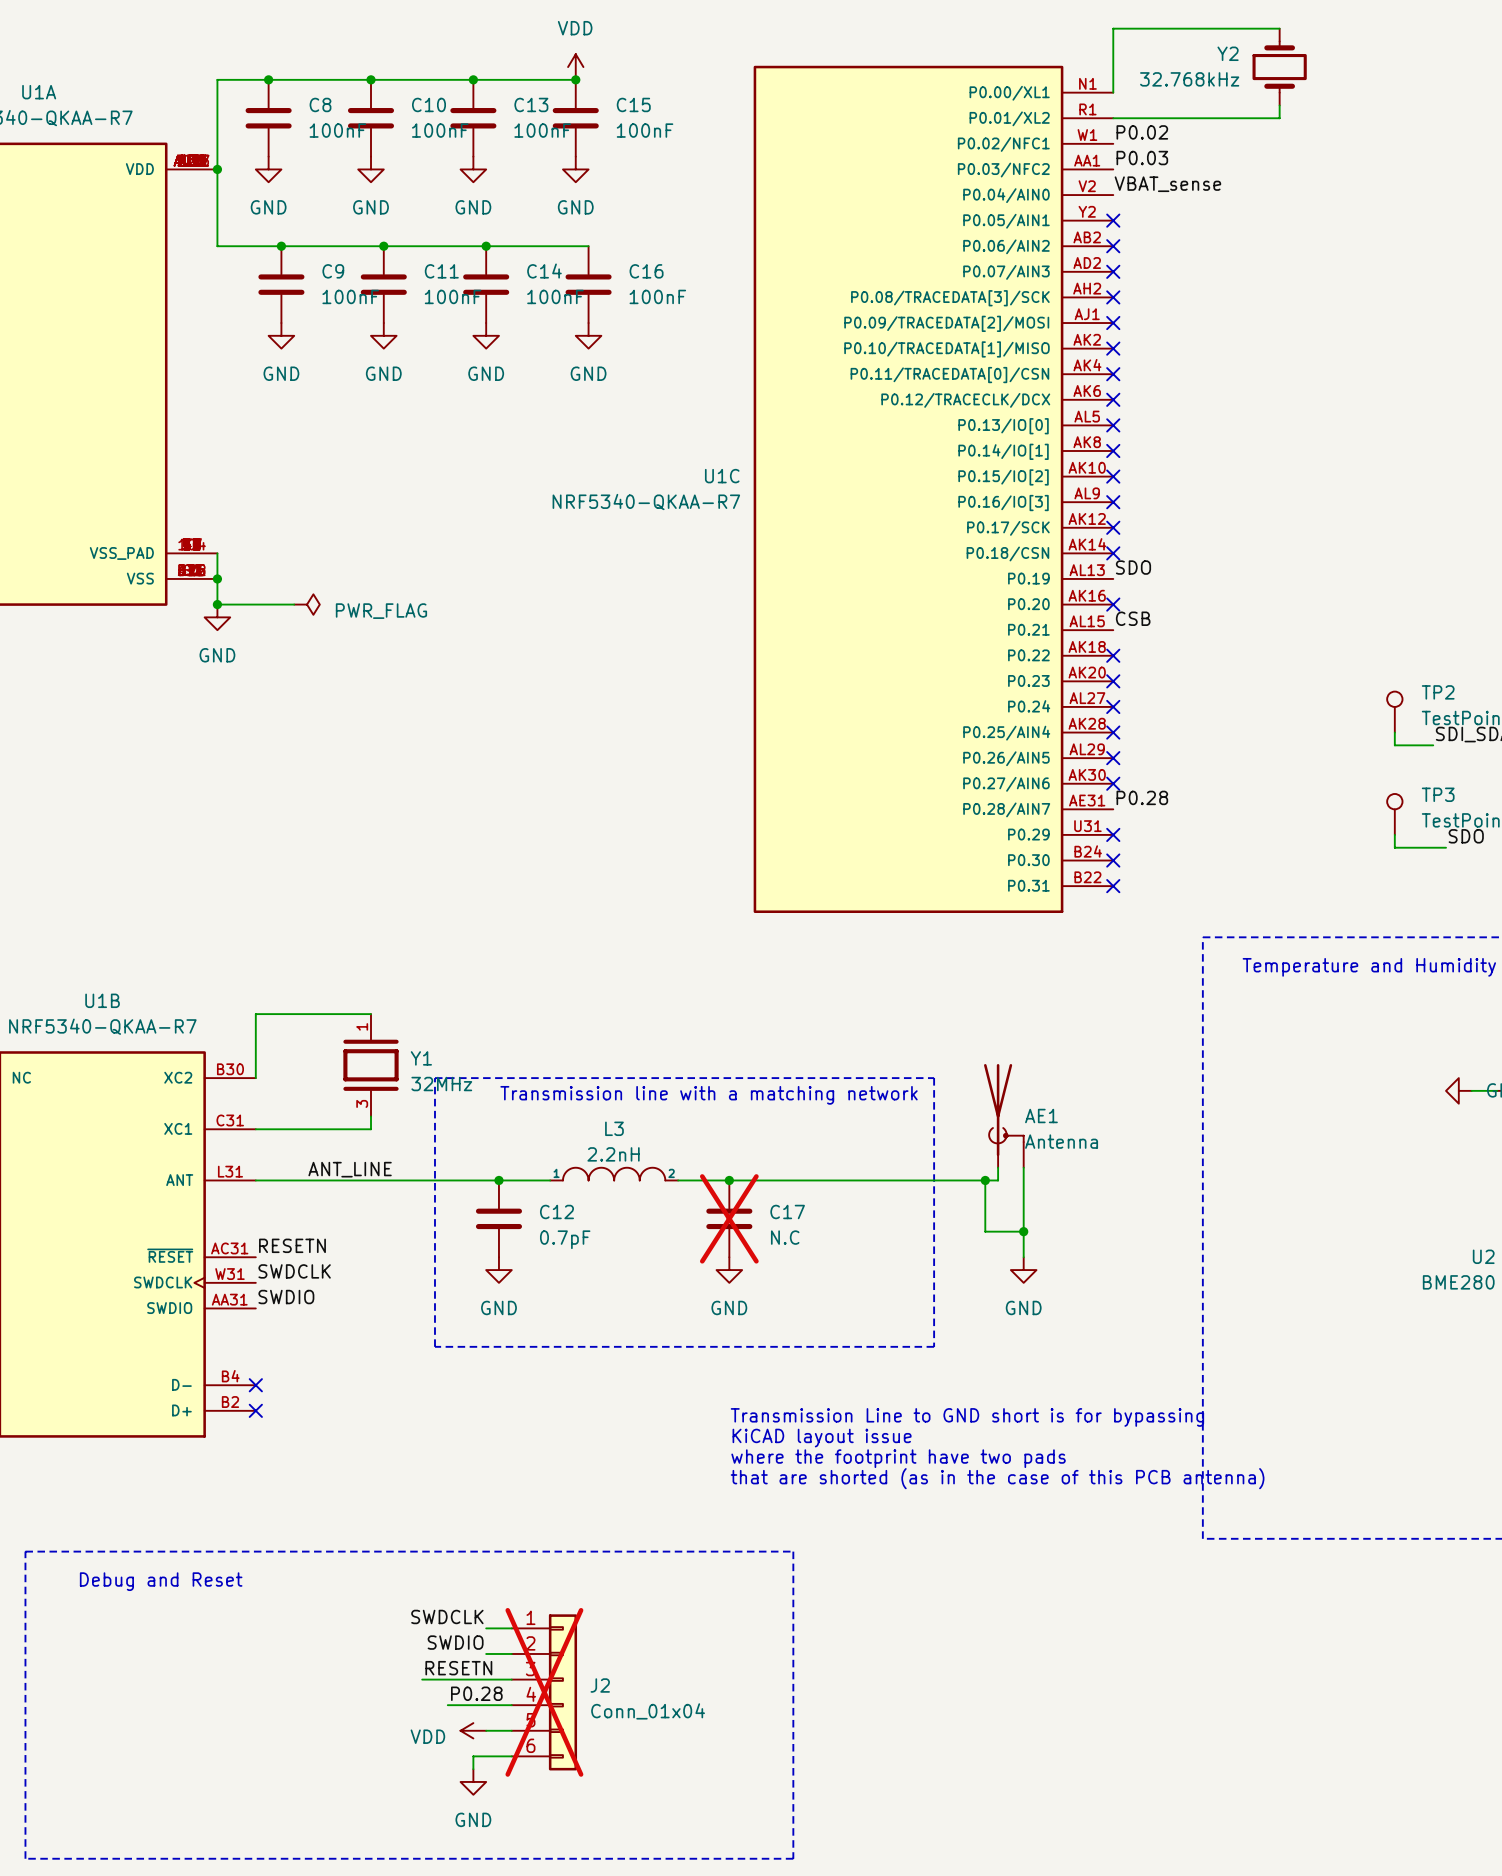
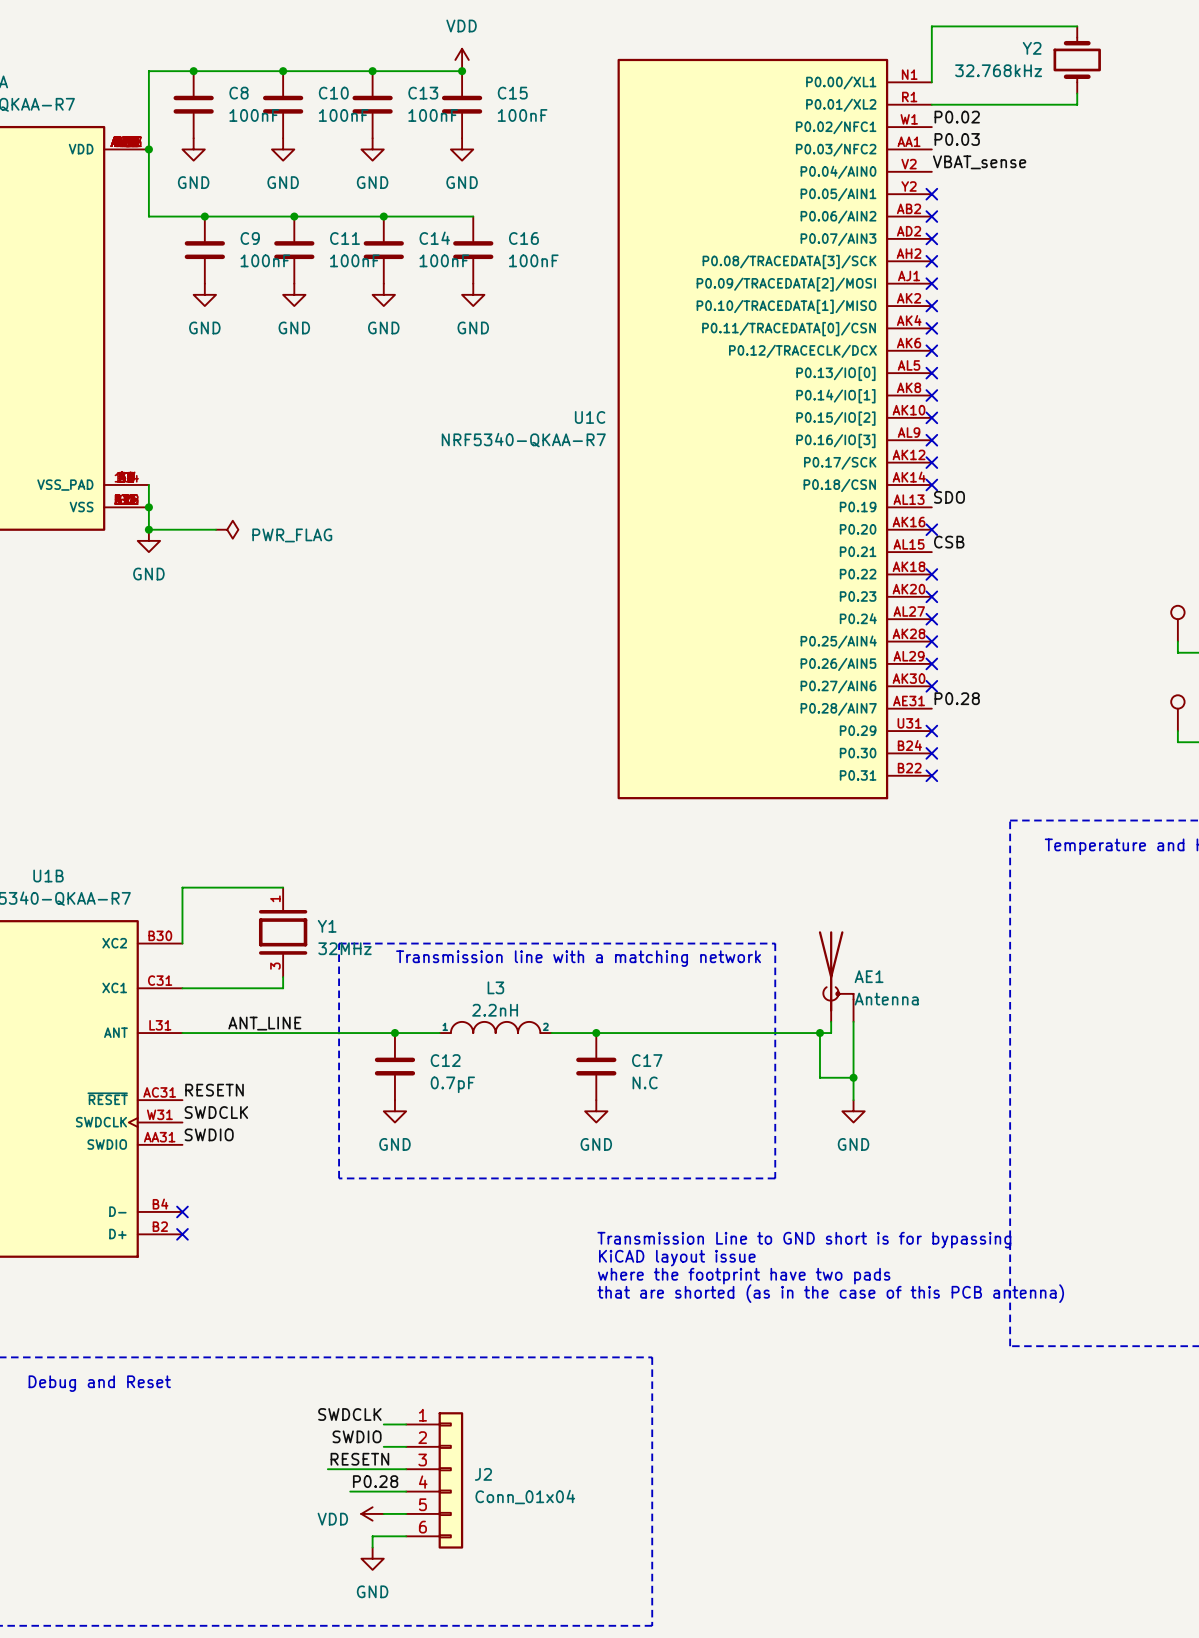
C17 do-not-place cross: (729, 1218) -> none
J2 do-not-place cross: (544, 1692) -> none

